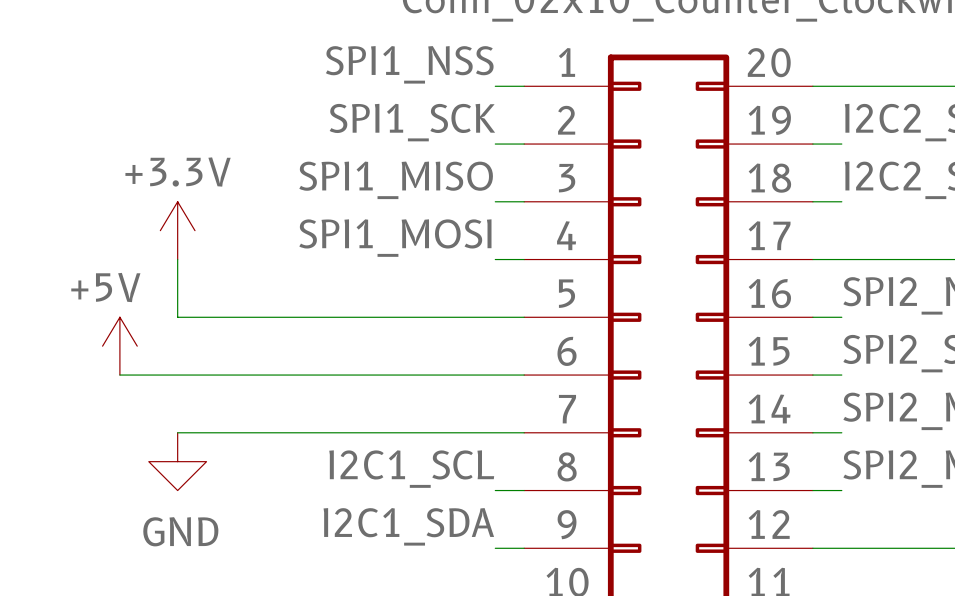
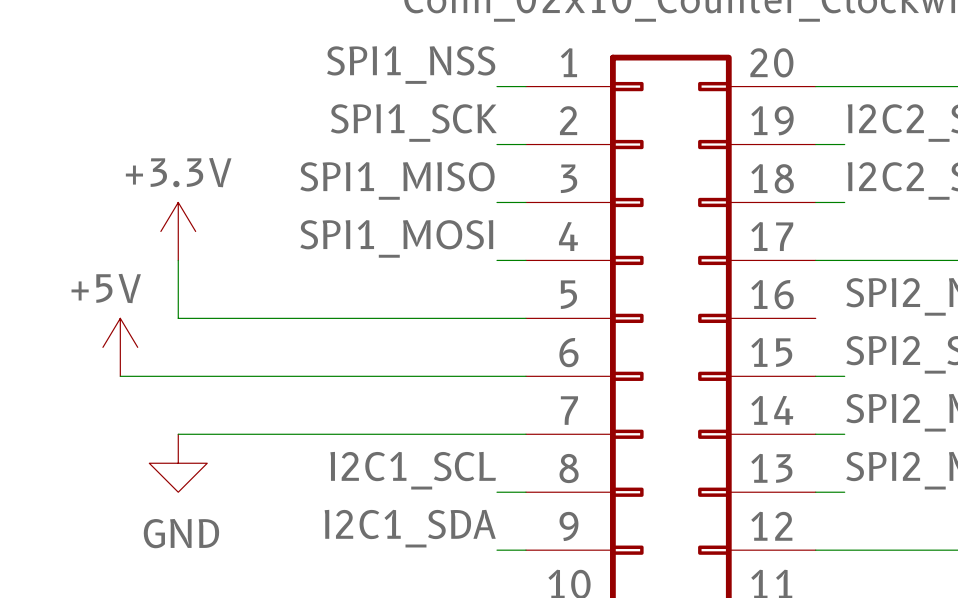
wire: (812, 317) (841, 317) -> none

